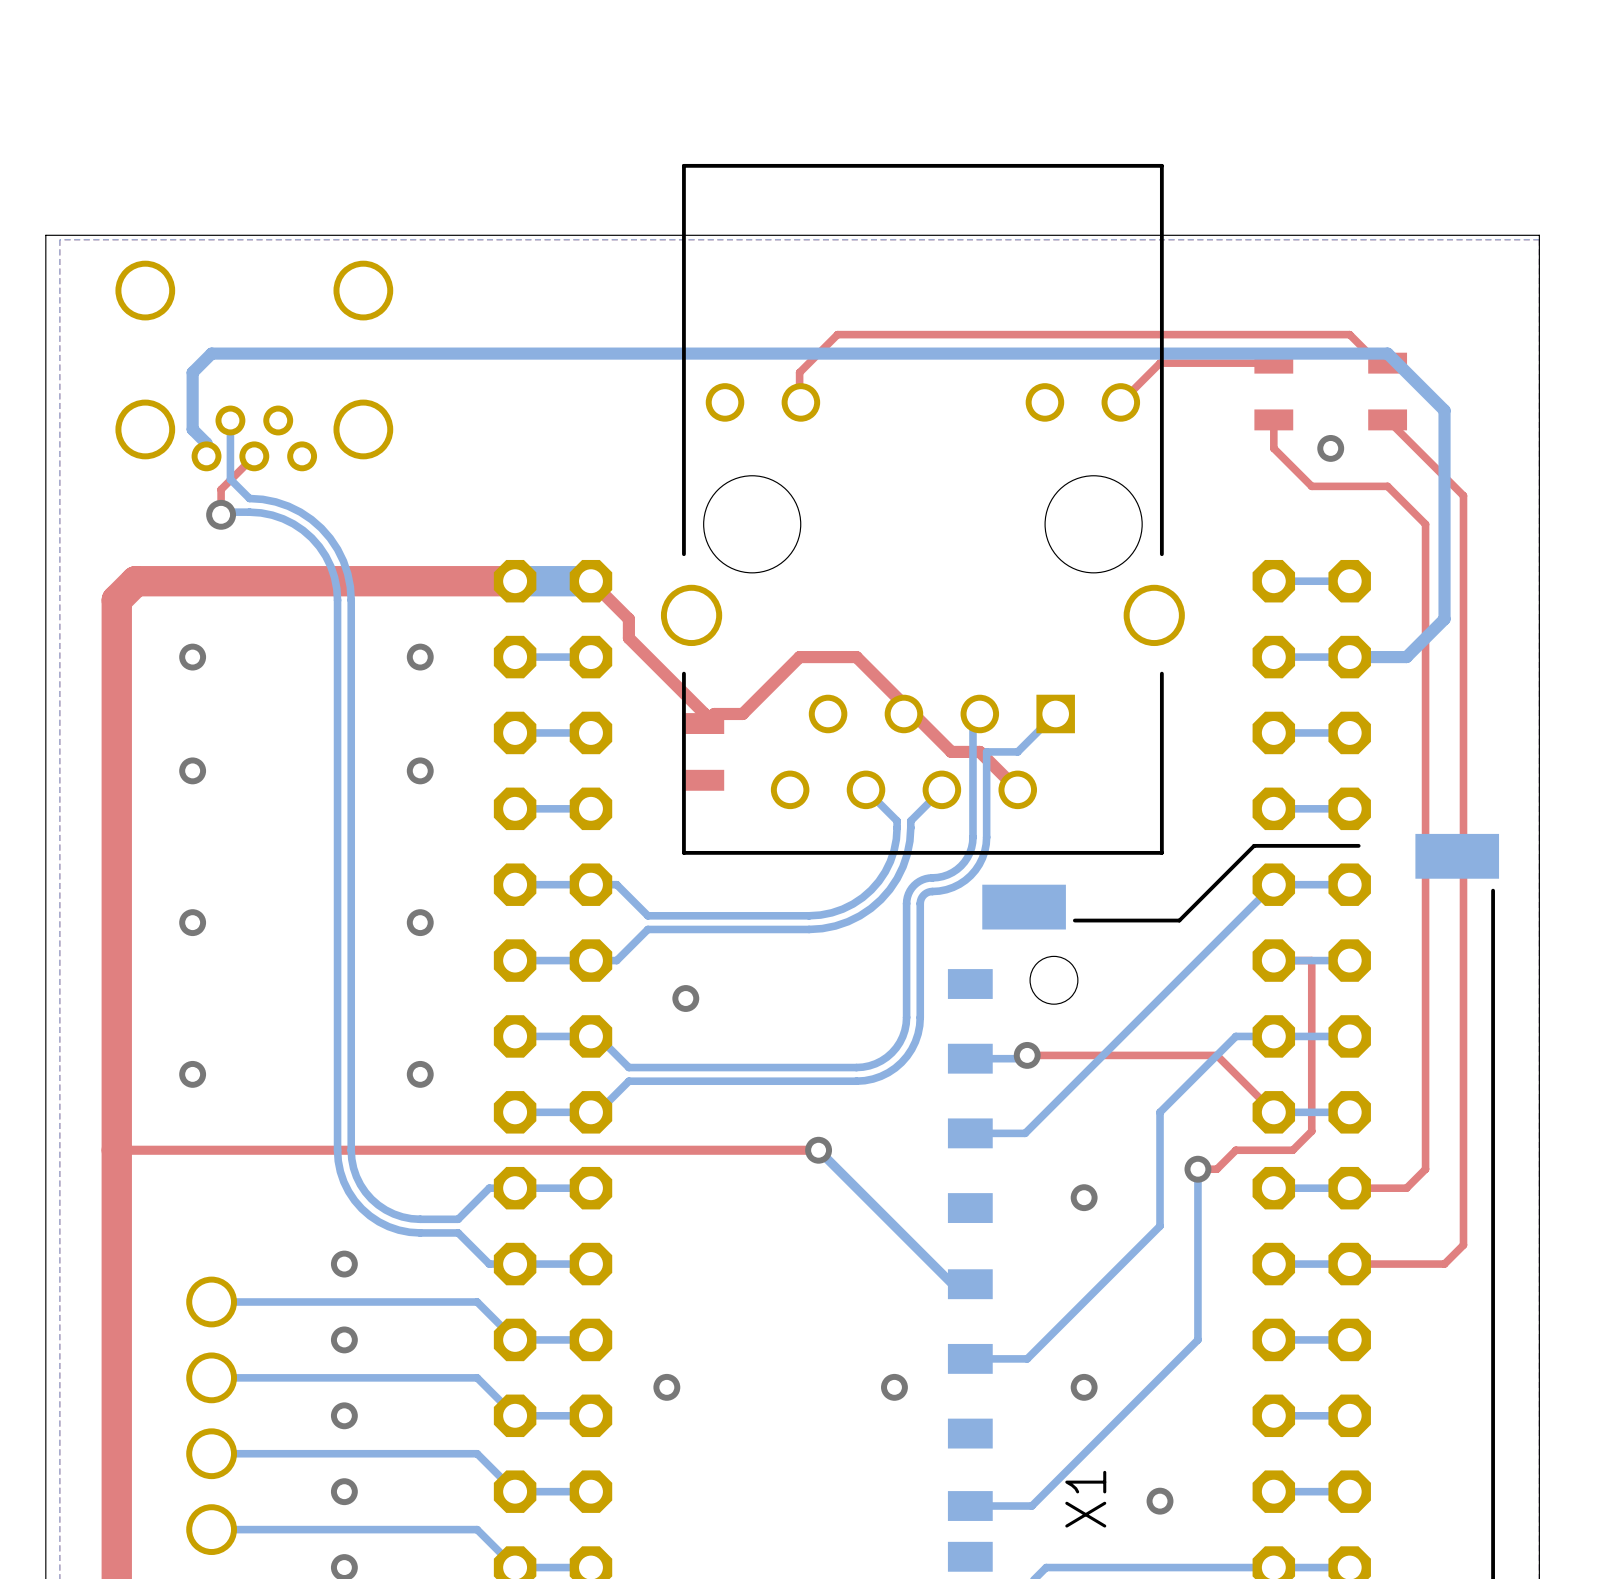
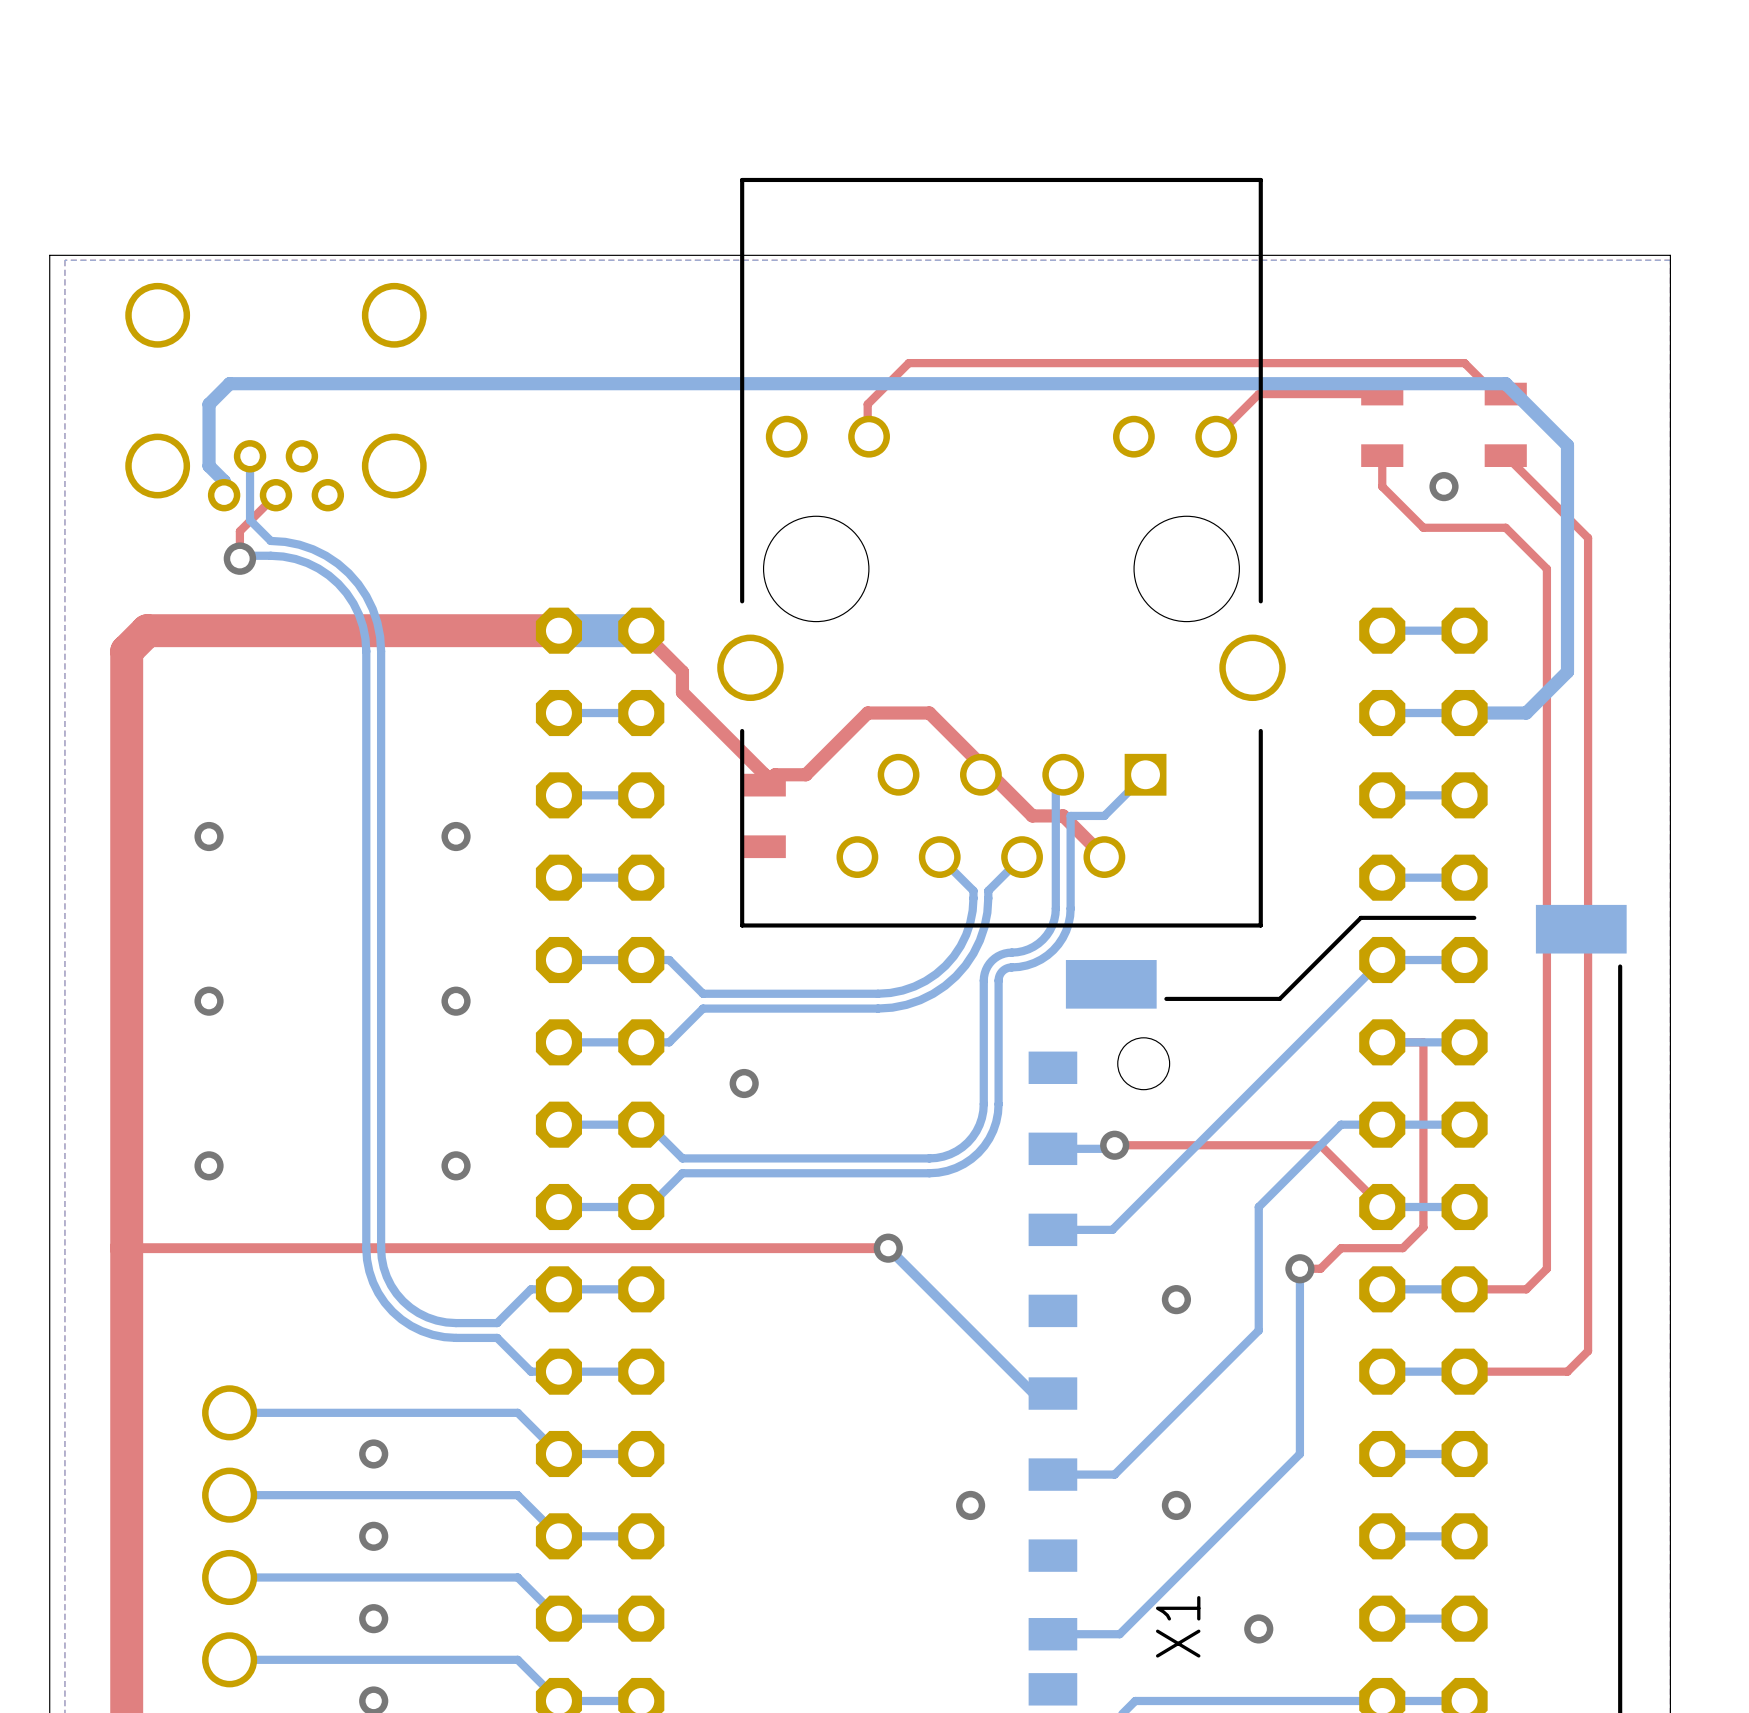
via: (192, 657) -> none
via: (420, 657) -> none
via: (344, 1264) -> none
via: (666, 1387) -> none

